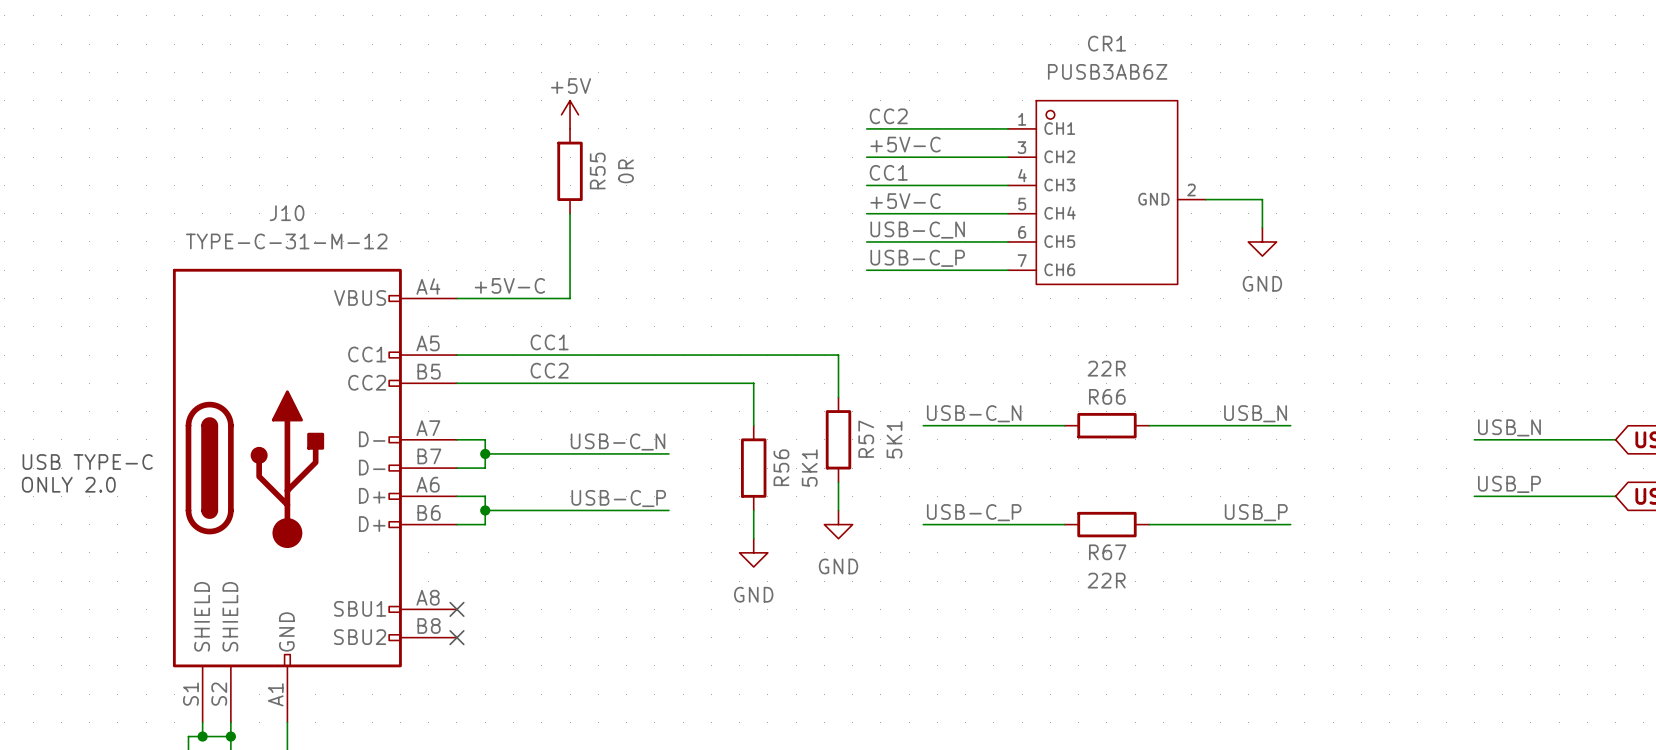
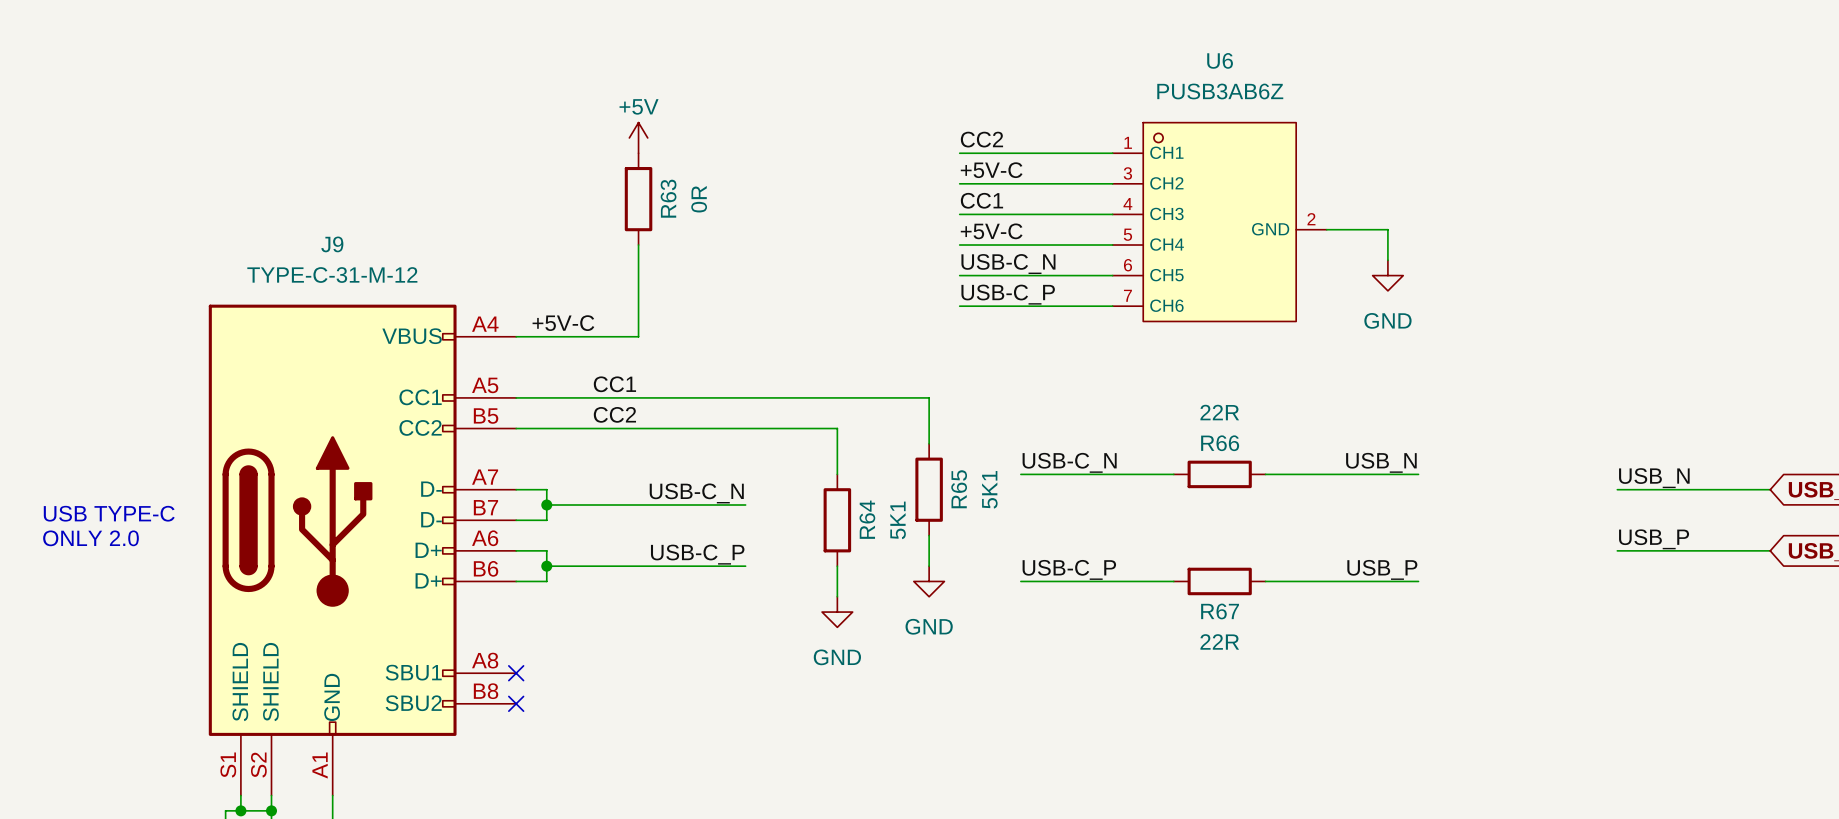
CR1 name: CR1 (1106, 43) -> U6 (1220, 60)
R55 name: R55 (597, 171) -> R63 (668, 198)
J10 name: J10 (287, 213) -> J9 (332, 244)
R57 name: R57 (866, 439) -> R65 (959, 489)
R56 name: R56 (781, 467) -> R64 (867, 519)

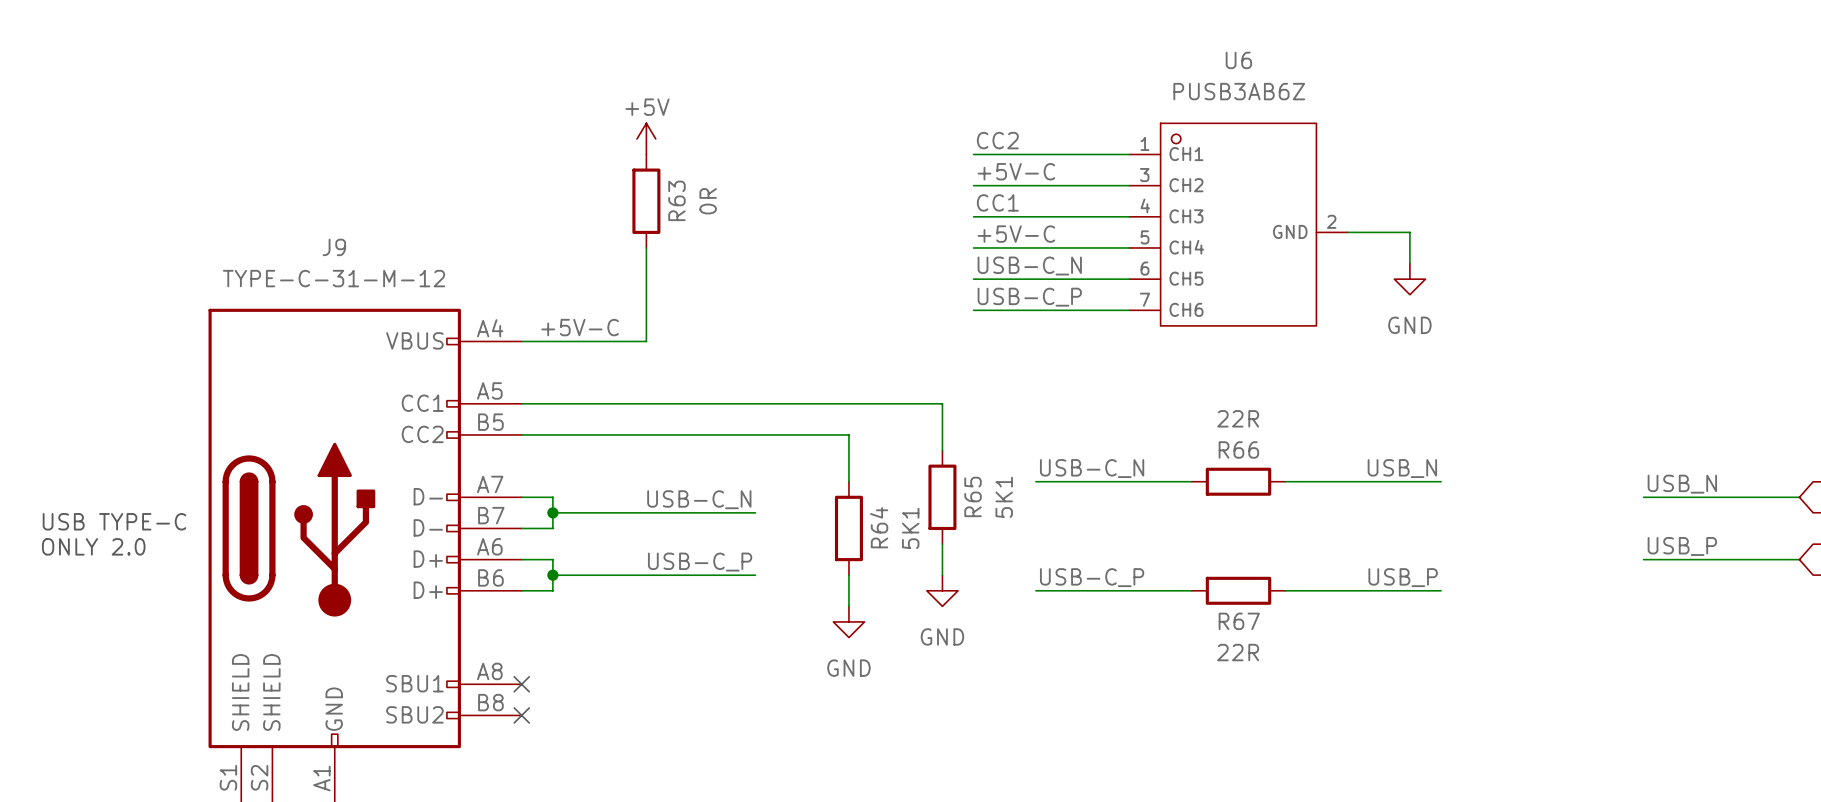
label: CC1 (614, 384) -> none
label: CC2 (614, 414) -> none

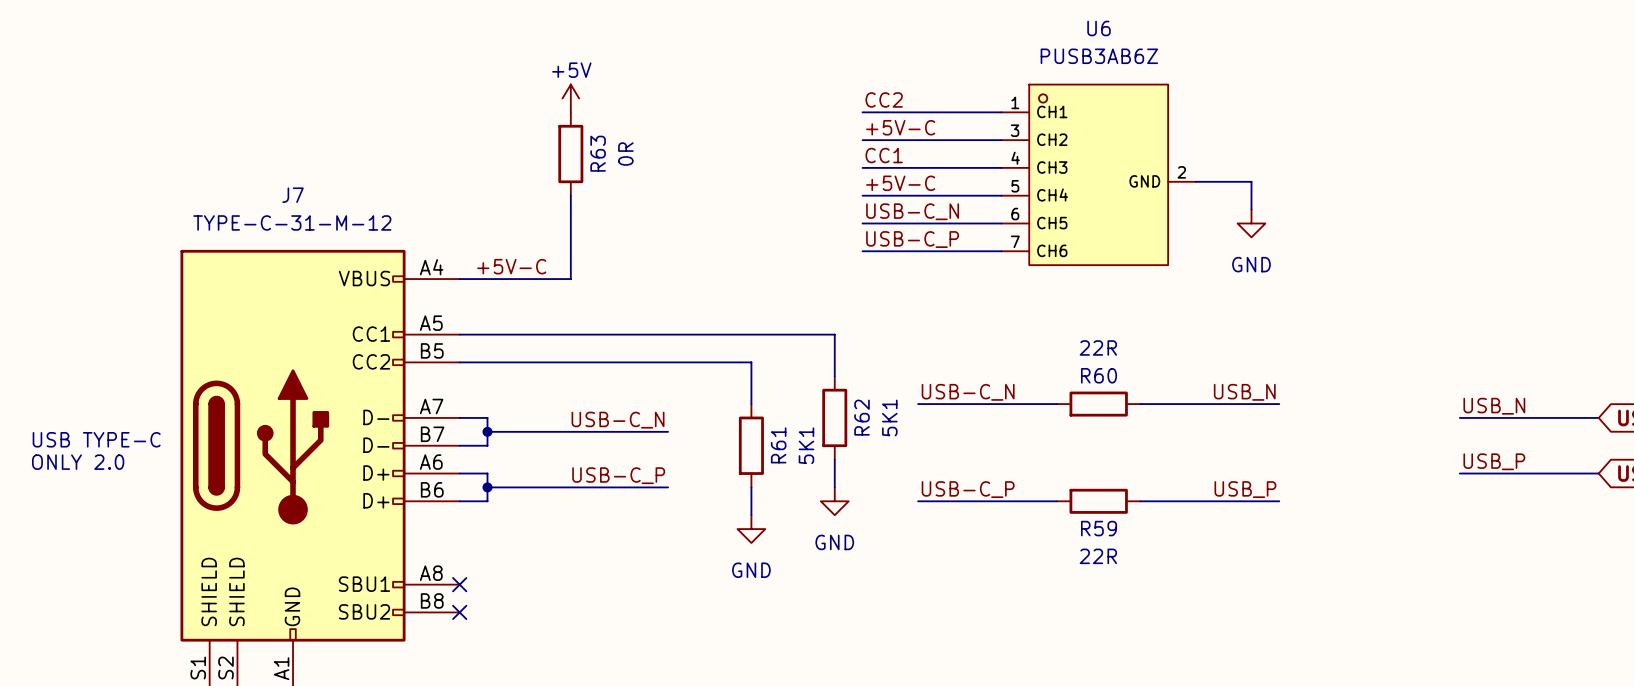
J9 name: J9 (334, 247) -> J7 (293, 195)
R66 name: R66 (1238, 449) -> R60 (1099, 375)
R65 name: R65 (973, 496) -> R62 (862, 417)
R64 name: R64 (879, 527) -> R61 (778, 445)
R67 name: R67 (1239, 621) -> R59 (1099, 528)

